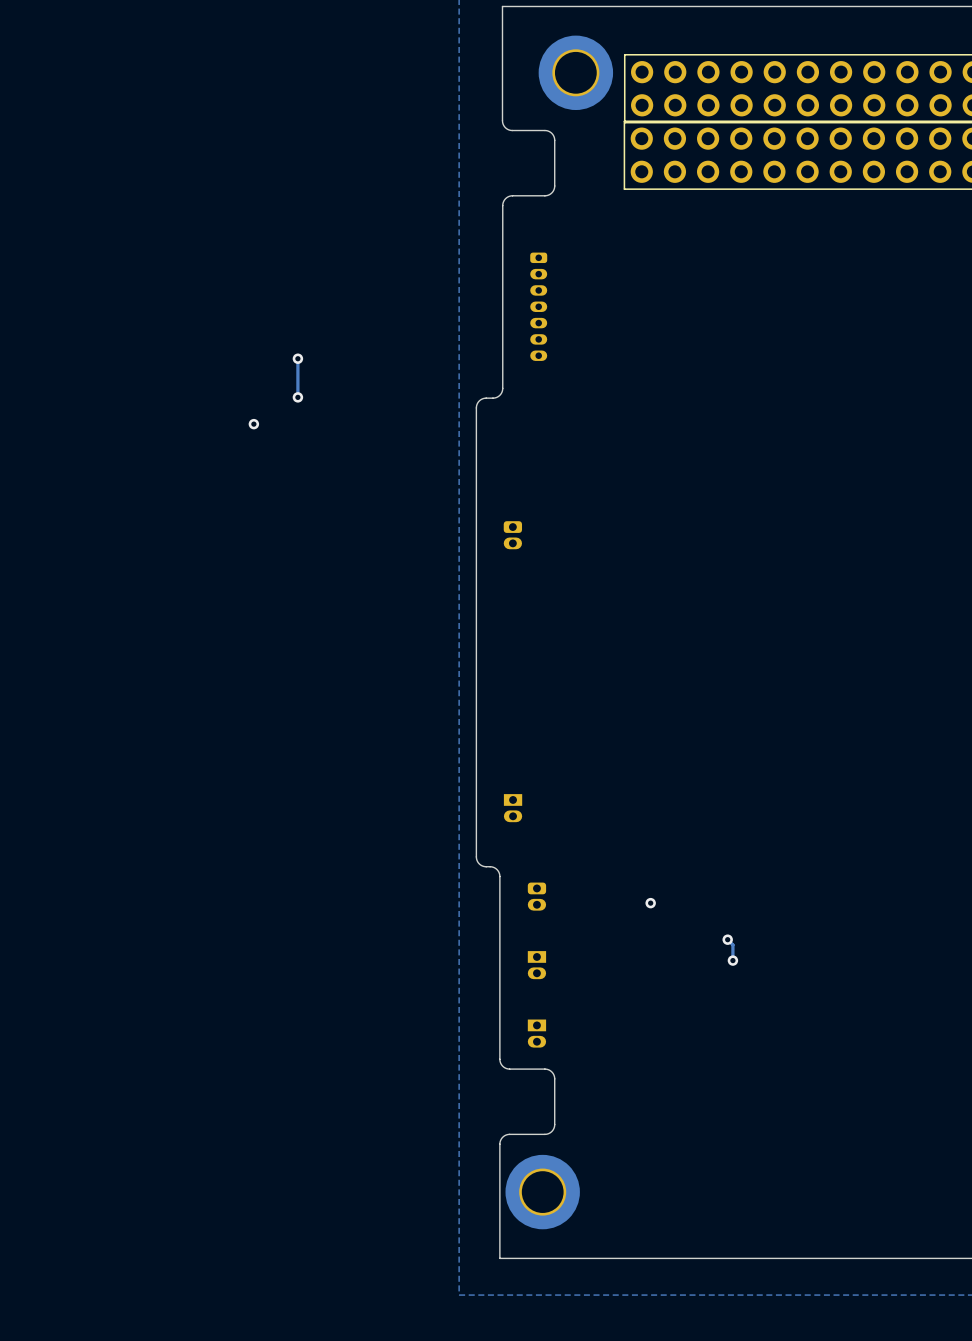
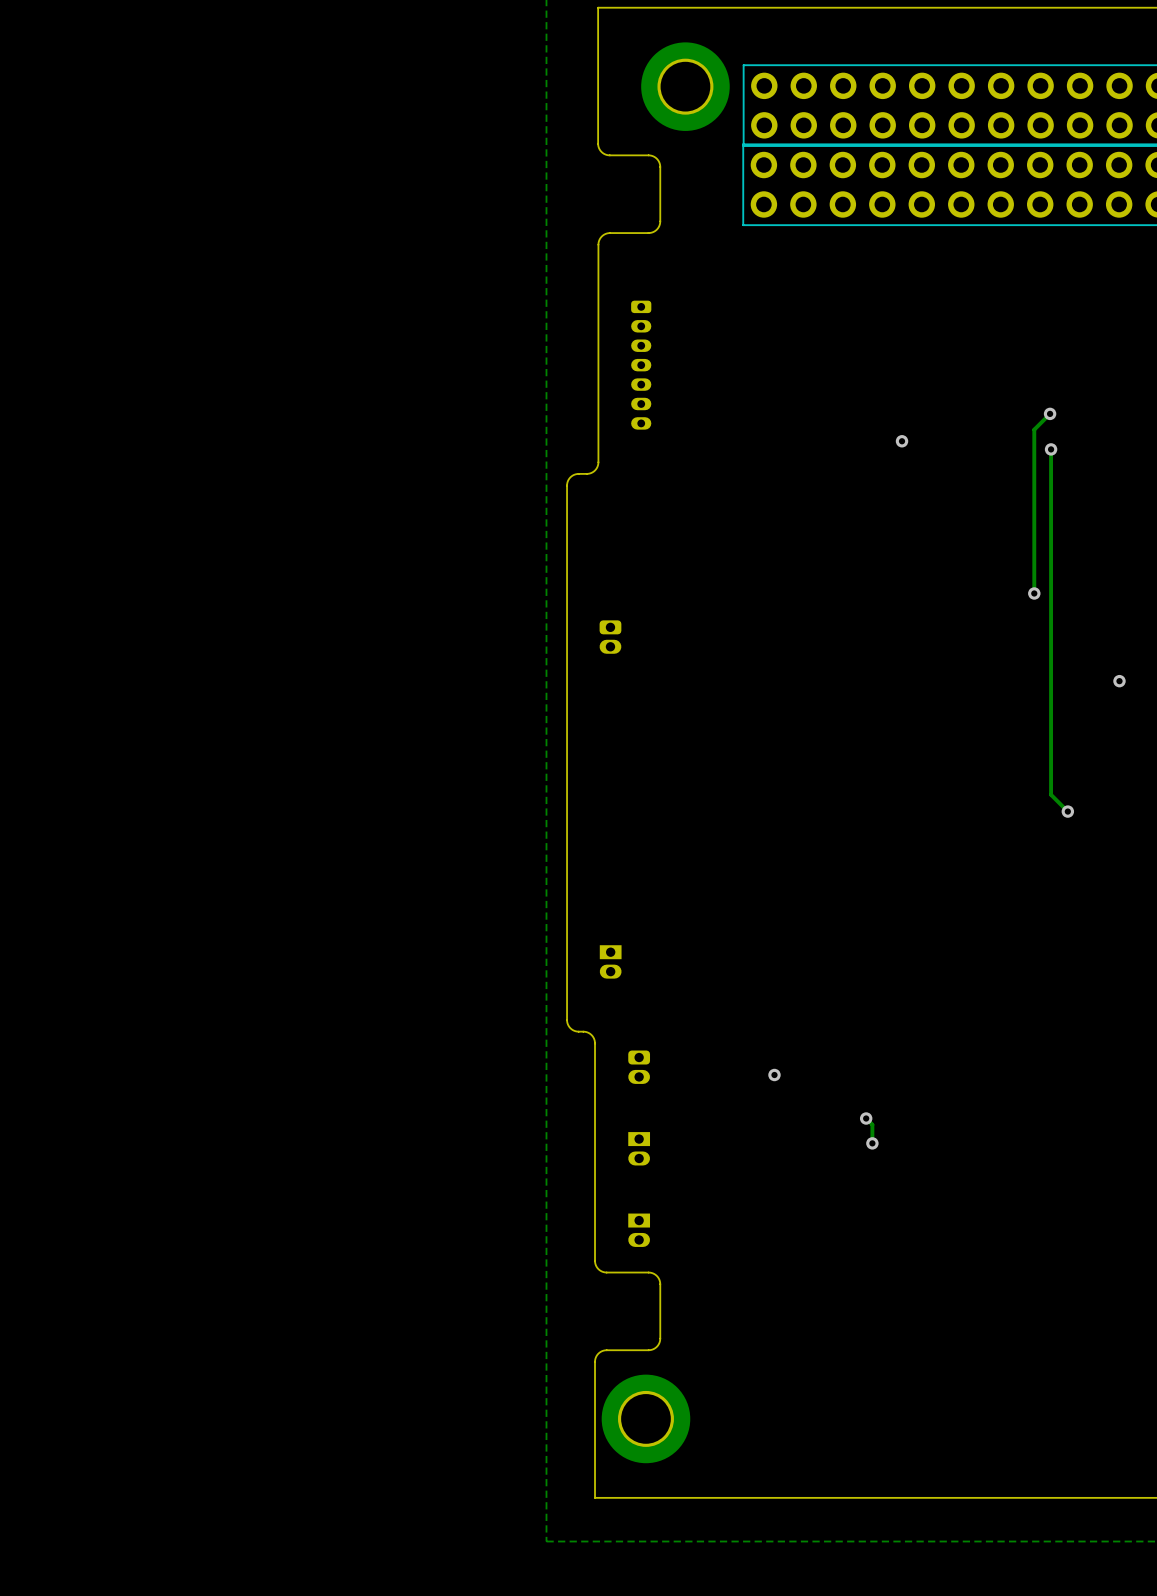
track: none -> (1050, 413) (1034, 429) (1034, 593)
via: none -> (1050, 413)
track: (297, 358) (297, 397) -> none
via: (297, 358) -> none
via: none -> (902, 441)
track: none -> (1051, 449) (1051, 794) (1067, 811)
via: none -> (1051, 449)
via: (297, 397) -> none
via: (253, 424) -> none
via: none -> (1034, 593)
via: none -> (1119, 681)
via: none -> (1067, 811)

